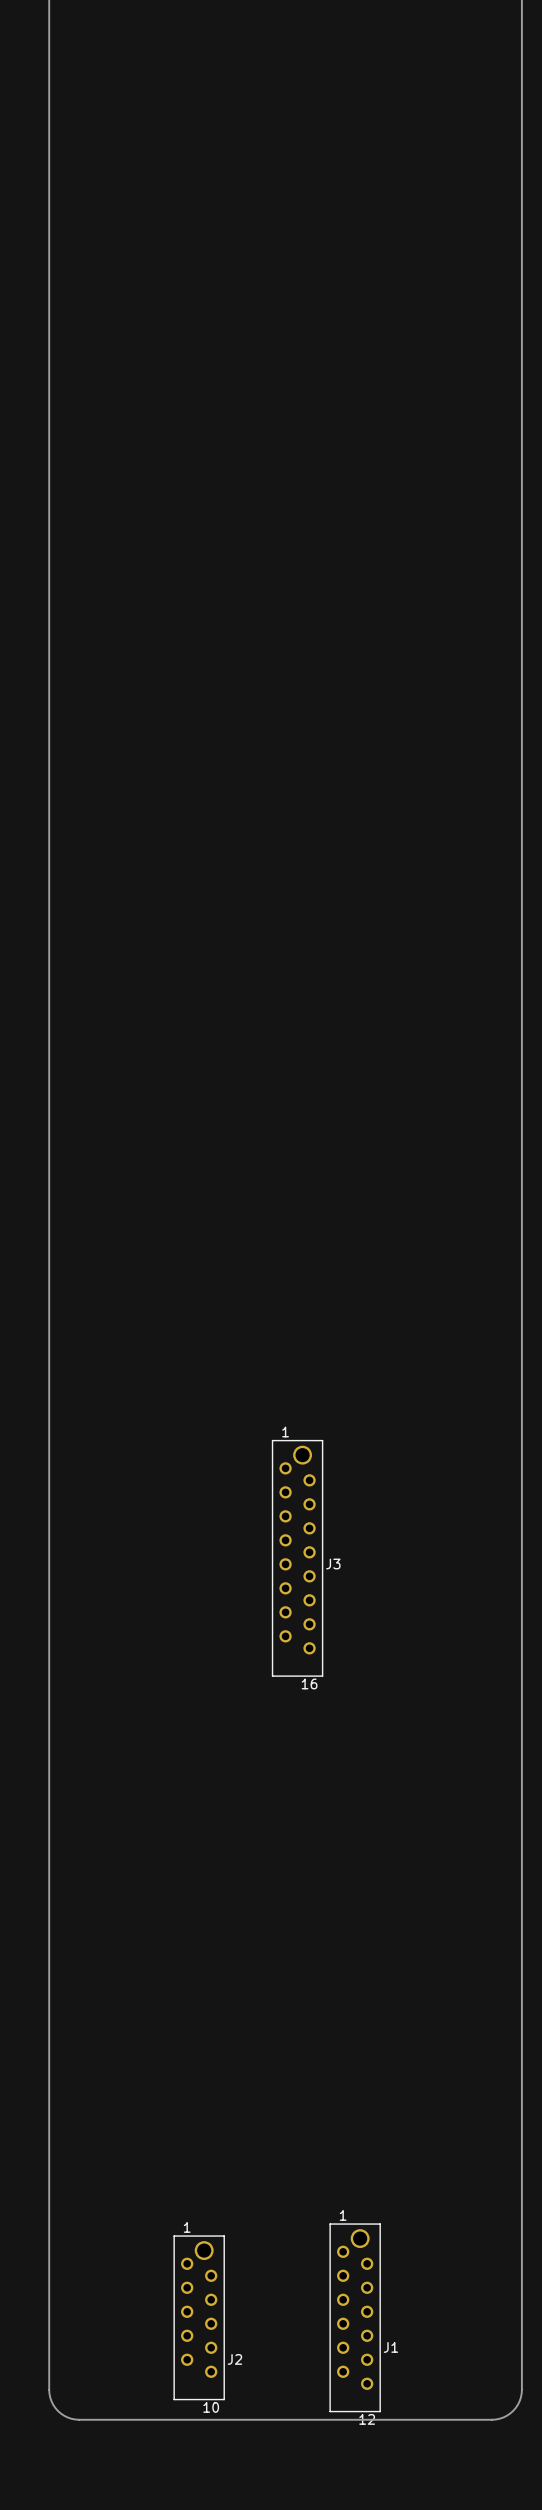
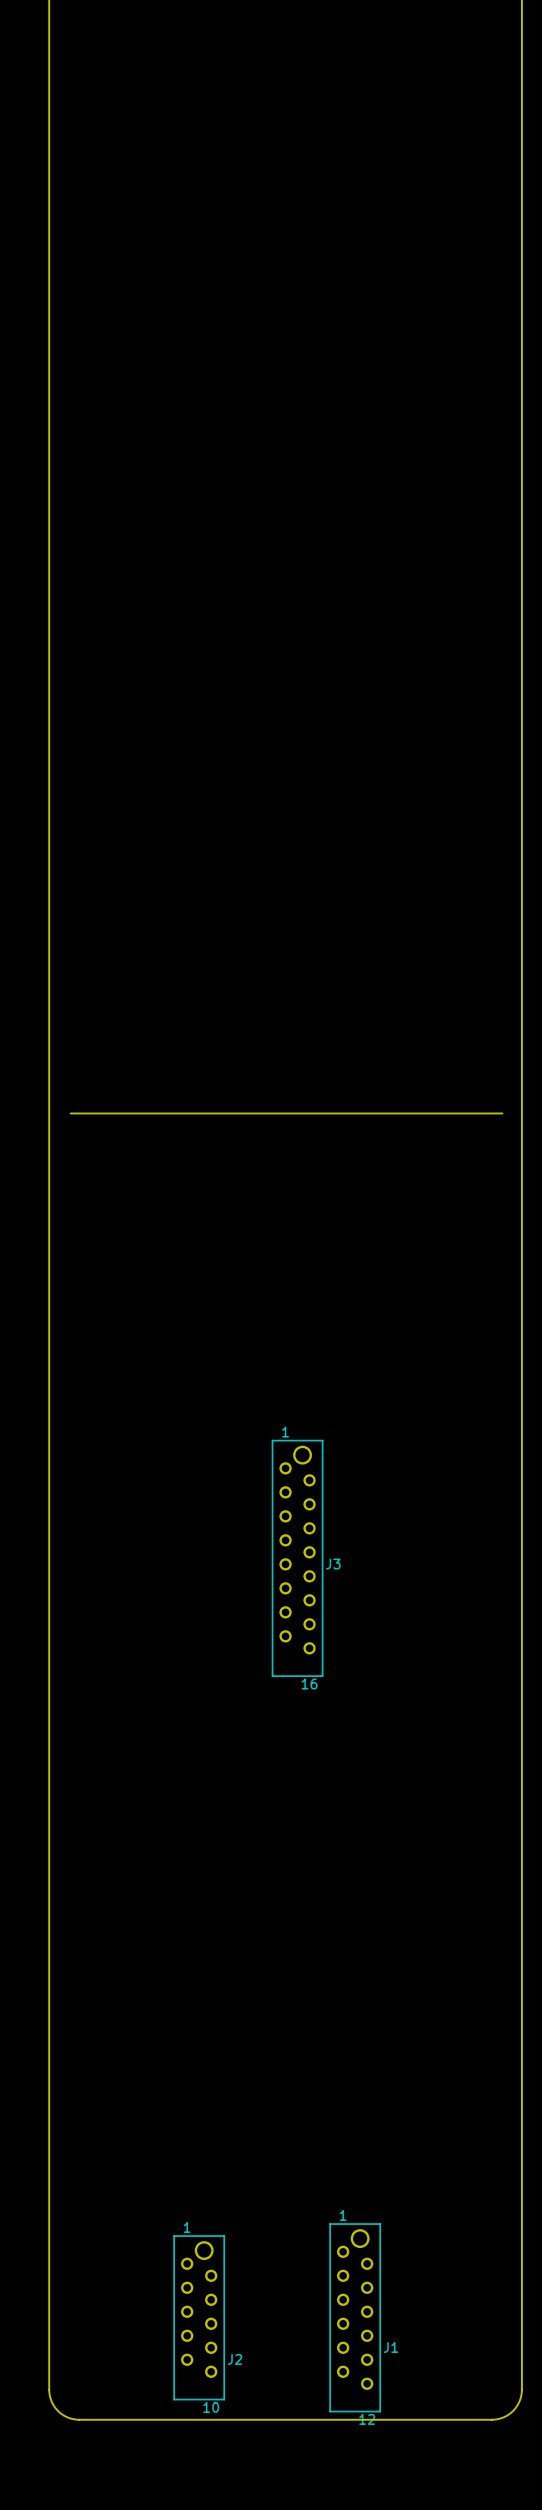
board edge: none -> (502, 1113) (70, 1113)

